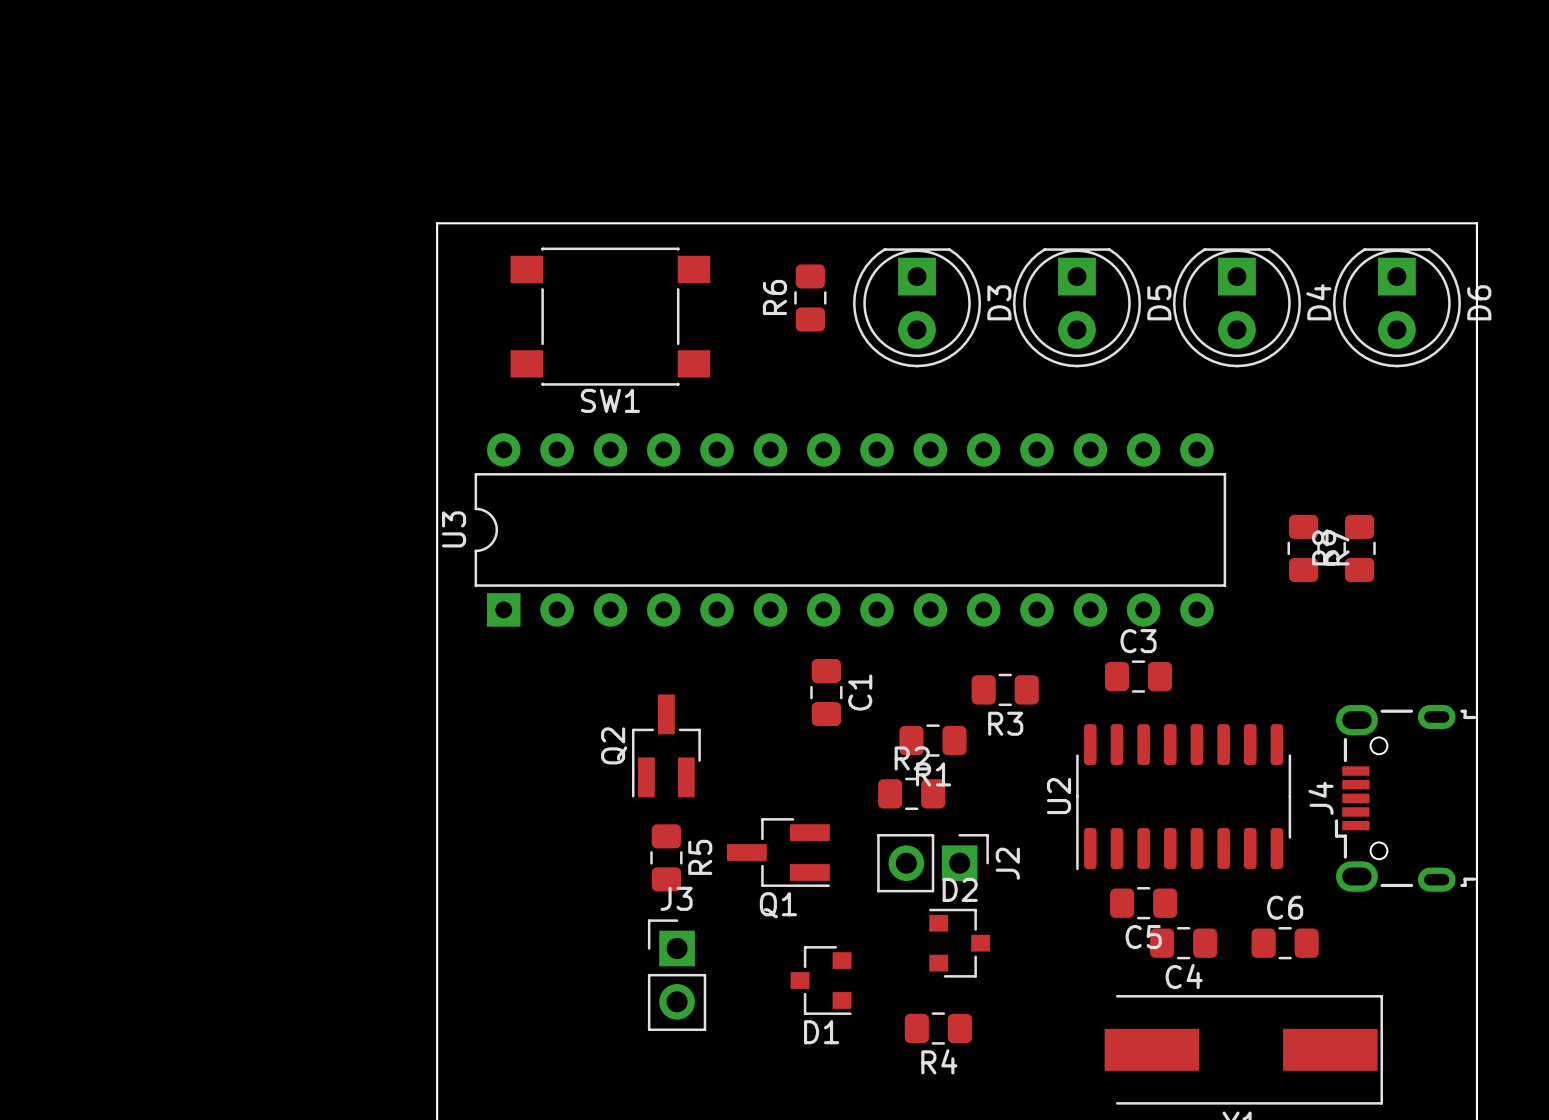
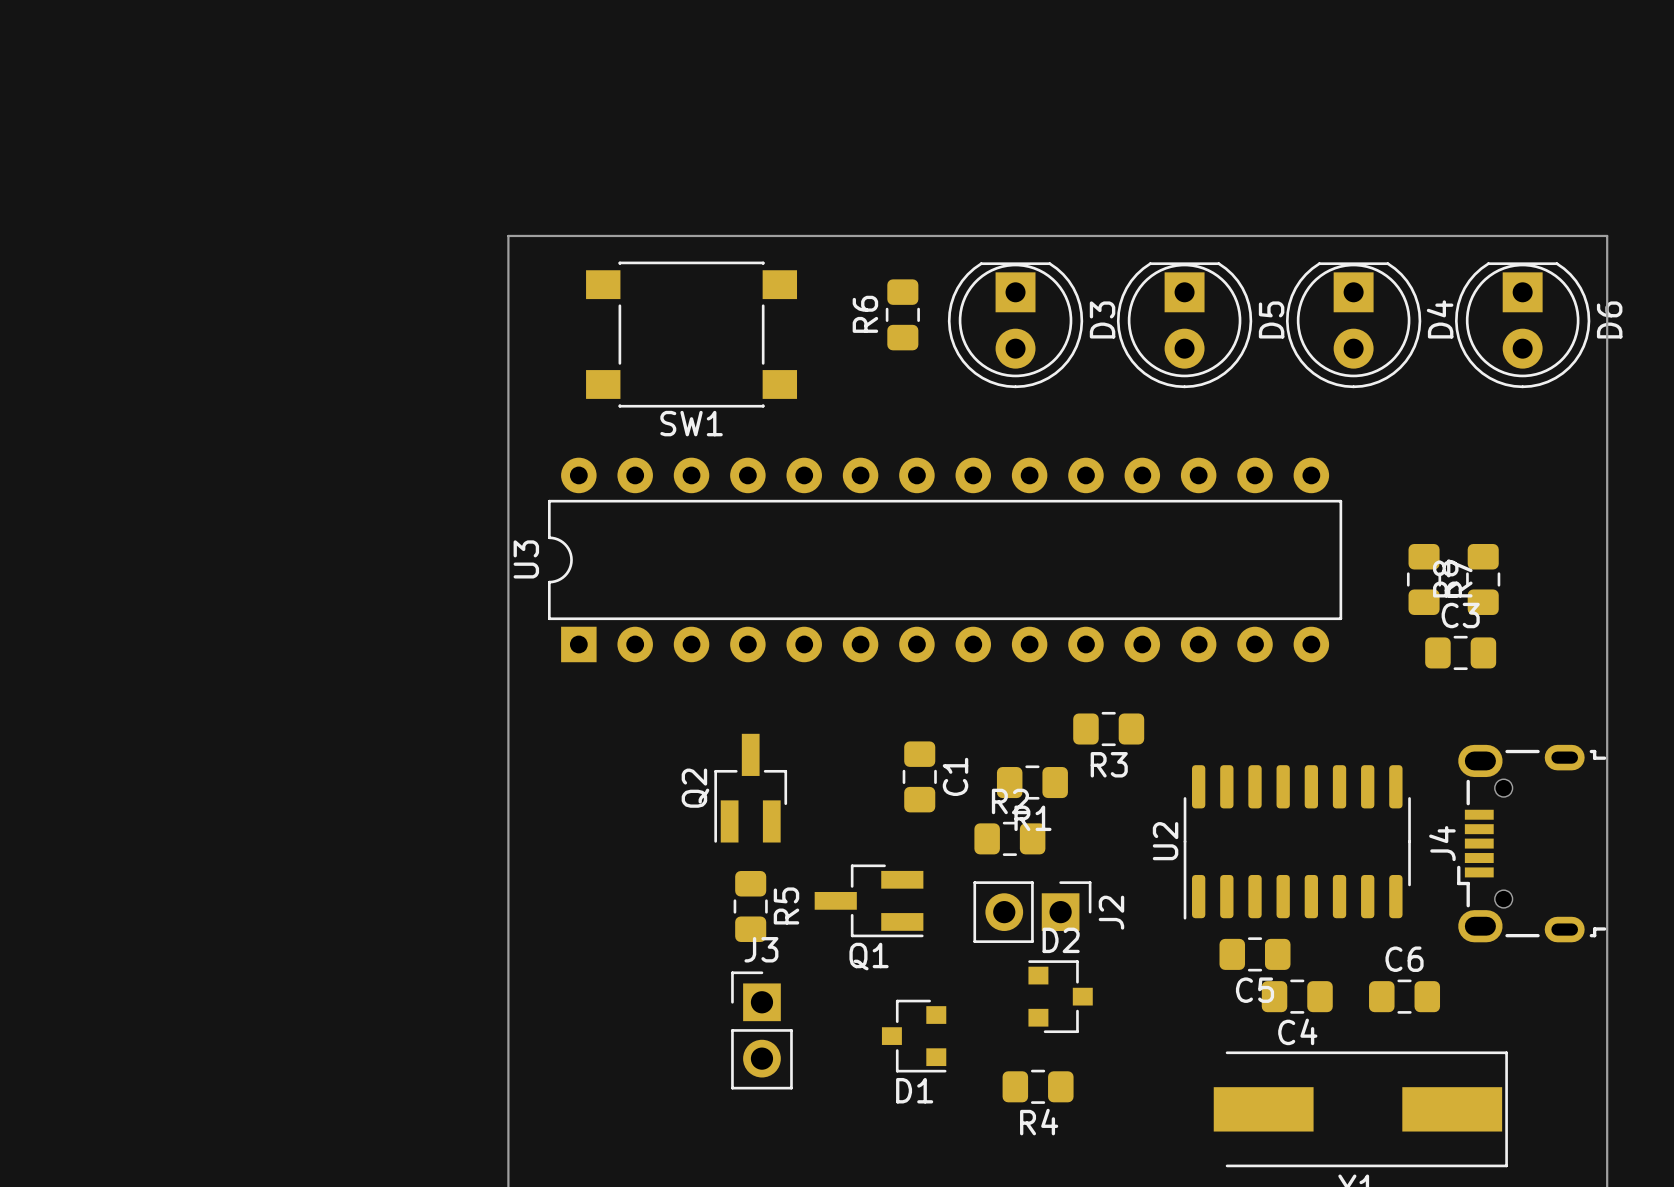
C3 position: (1138, 676) -> (1460, 652)
C1 position: (826, 692) -> (919, 776)

